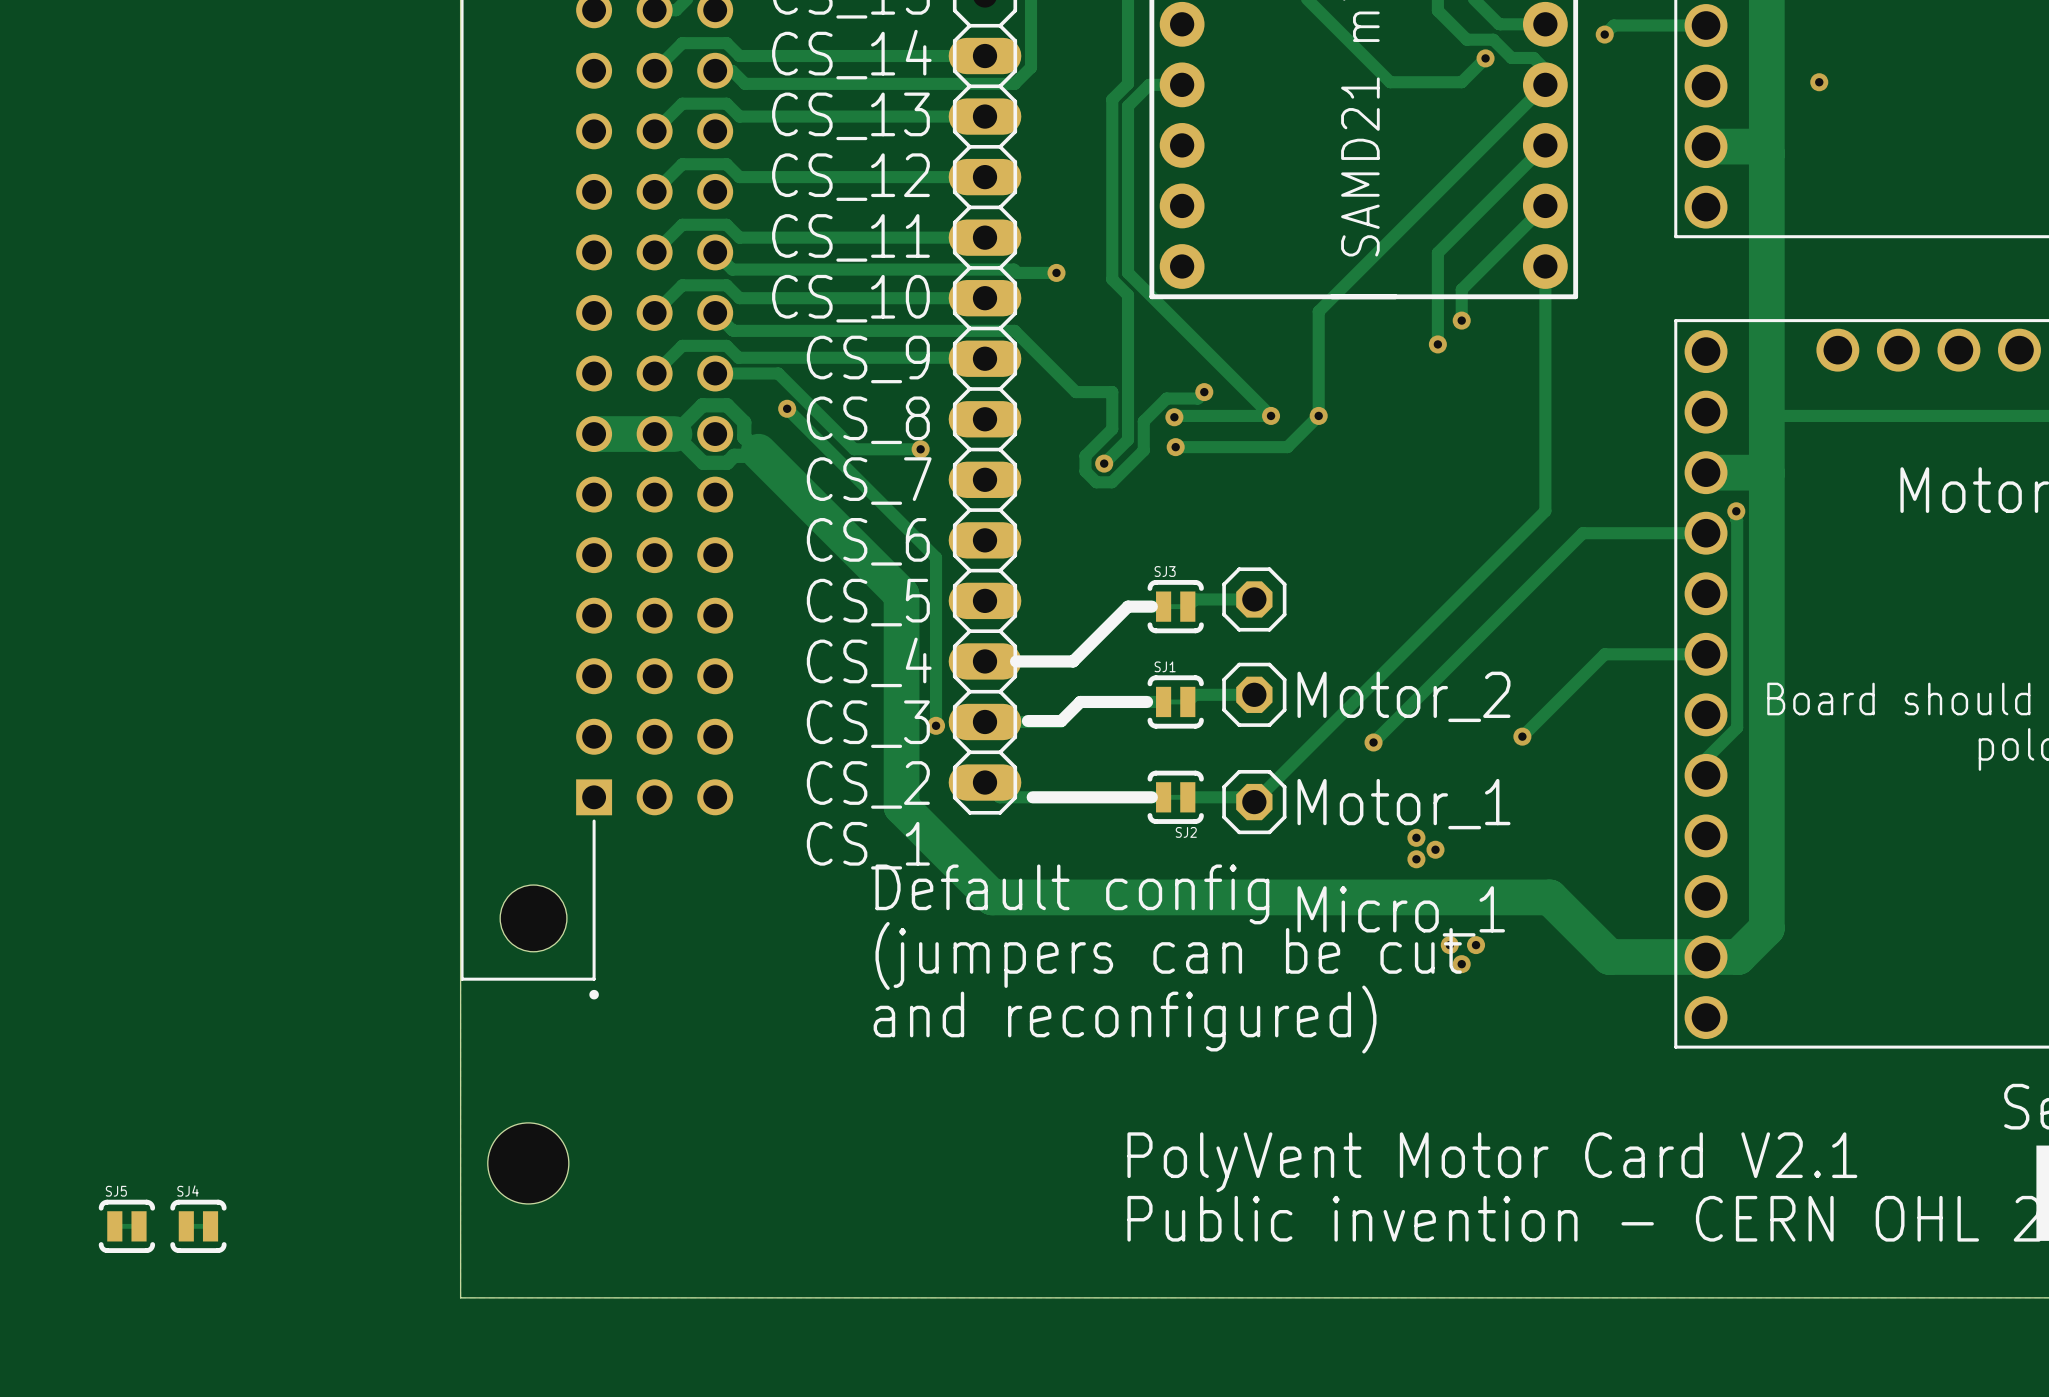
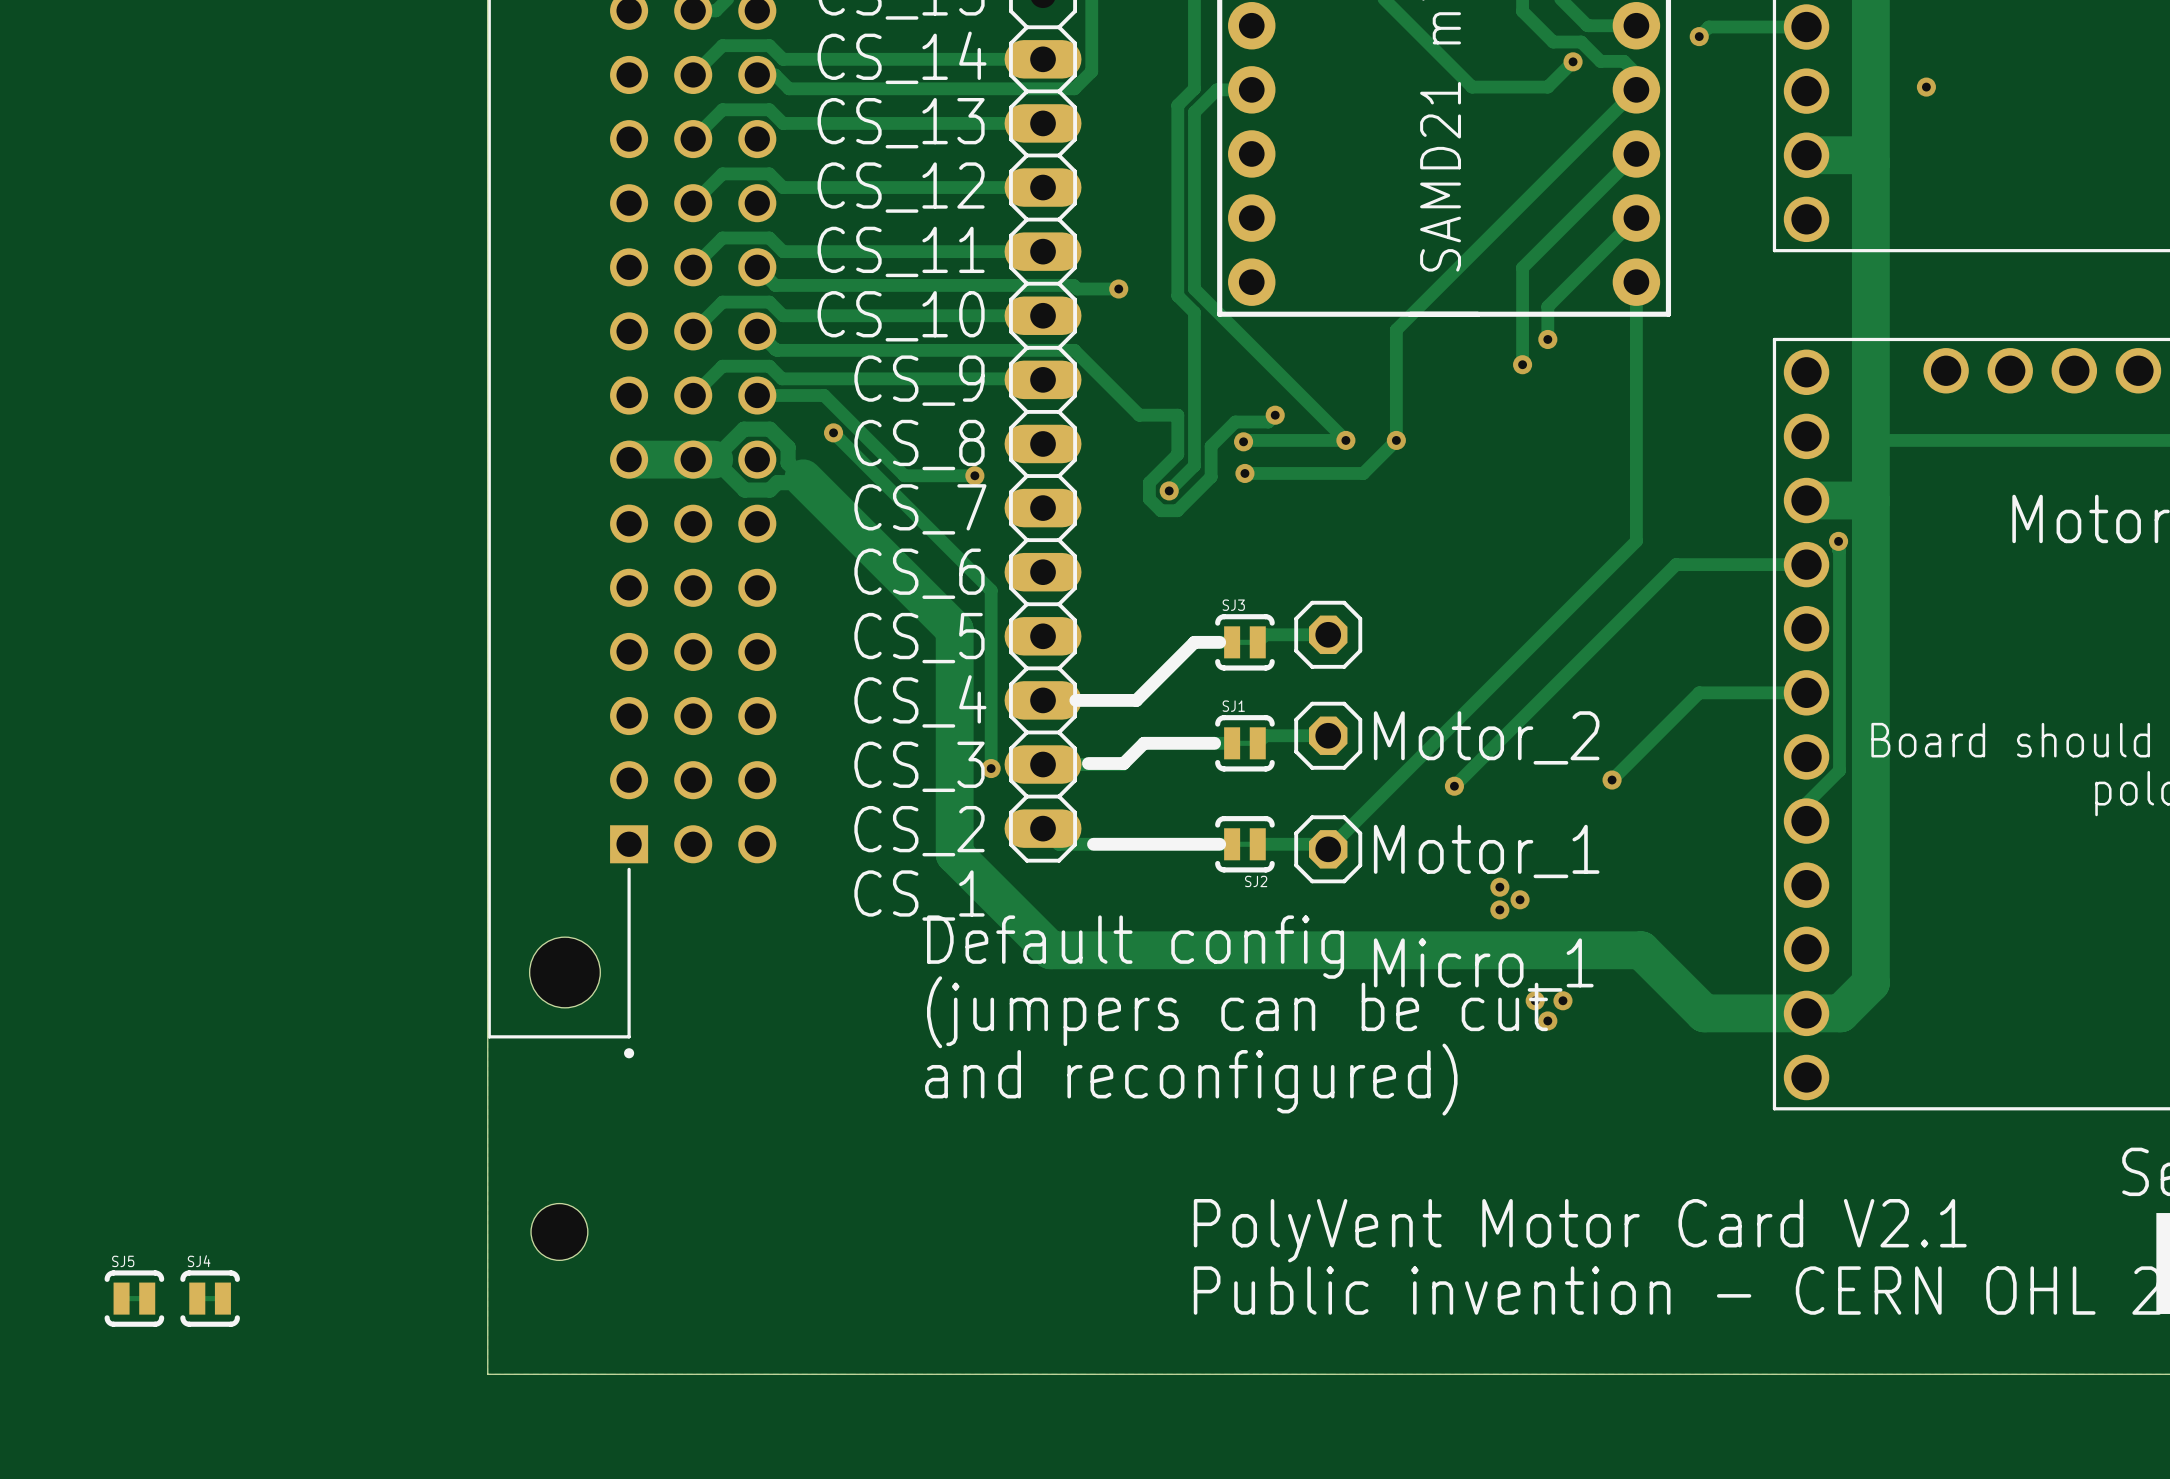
hole size: [487, 1122, 569, 1204] -> [531, 1203, 588, 1261]

